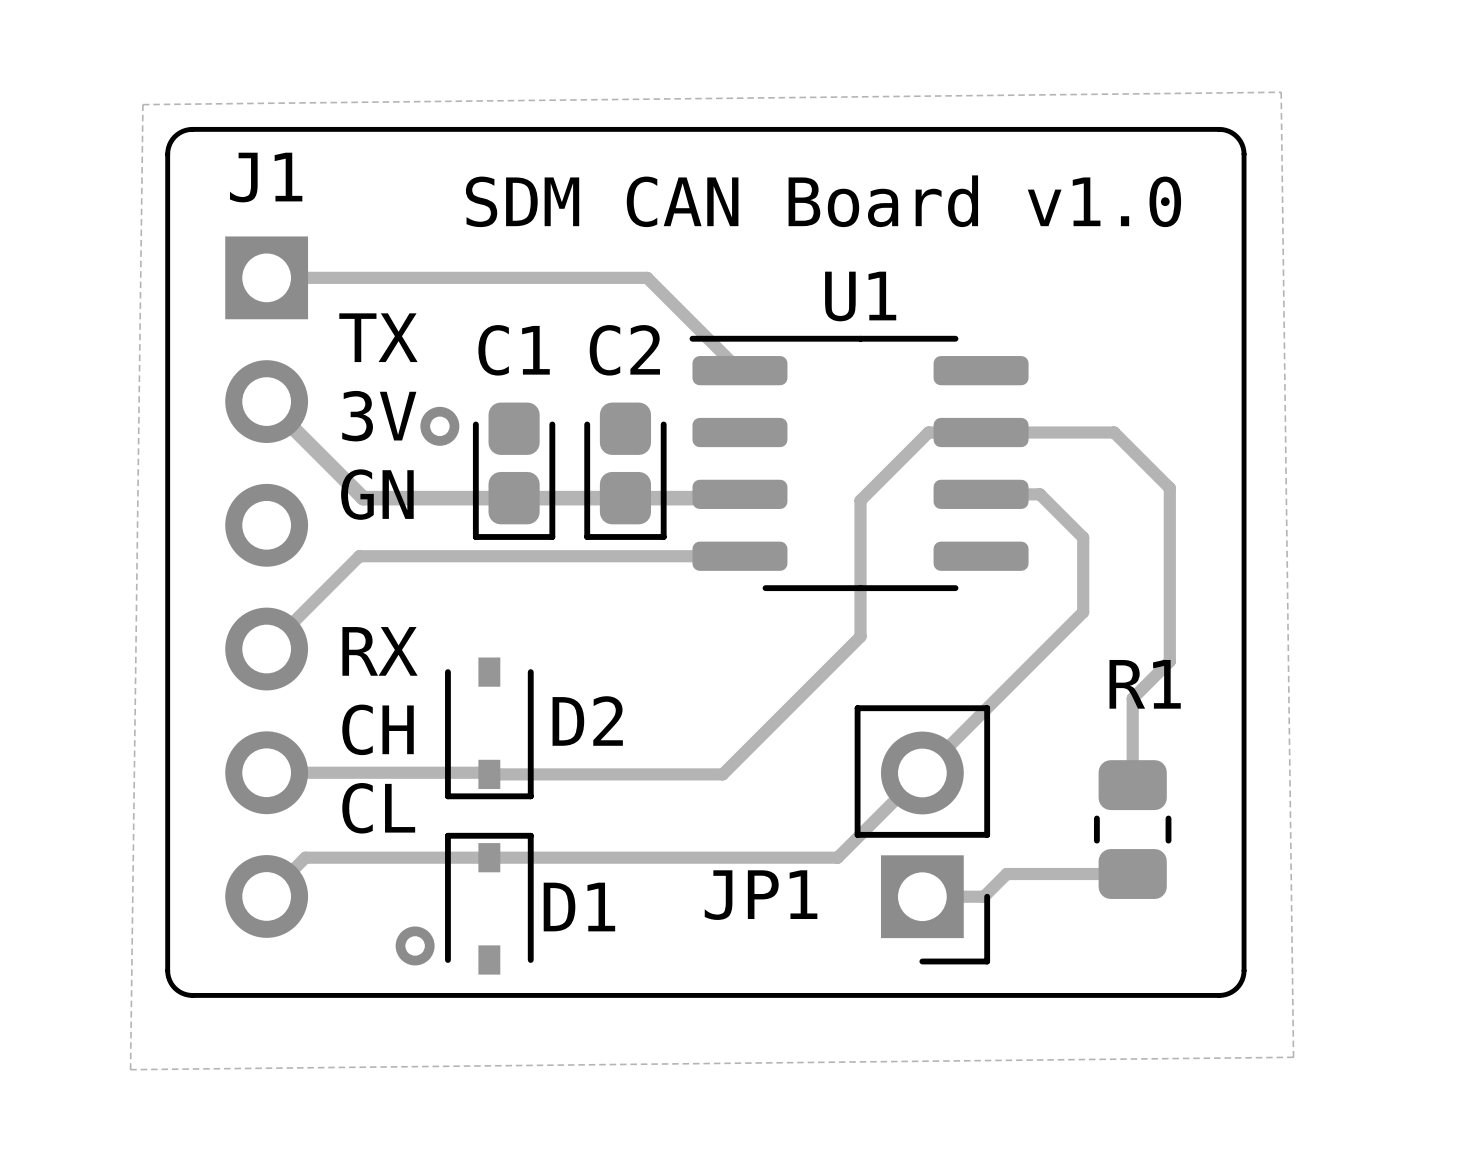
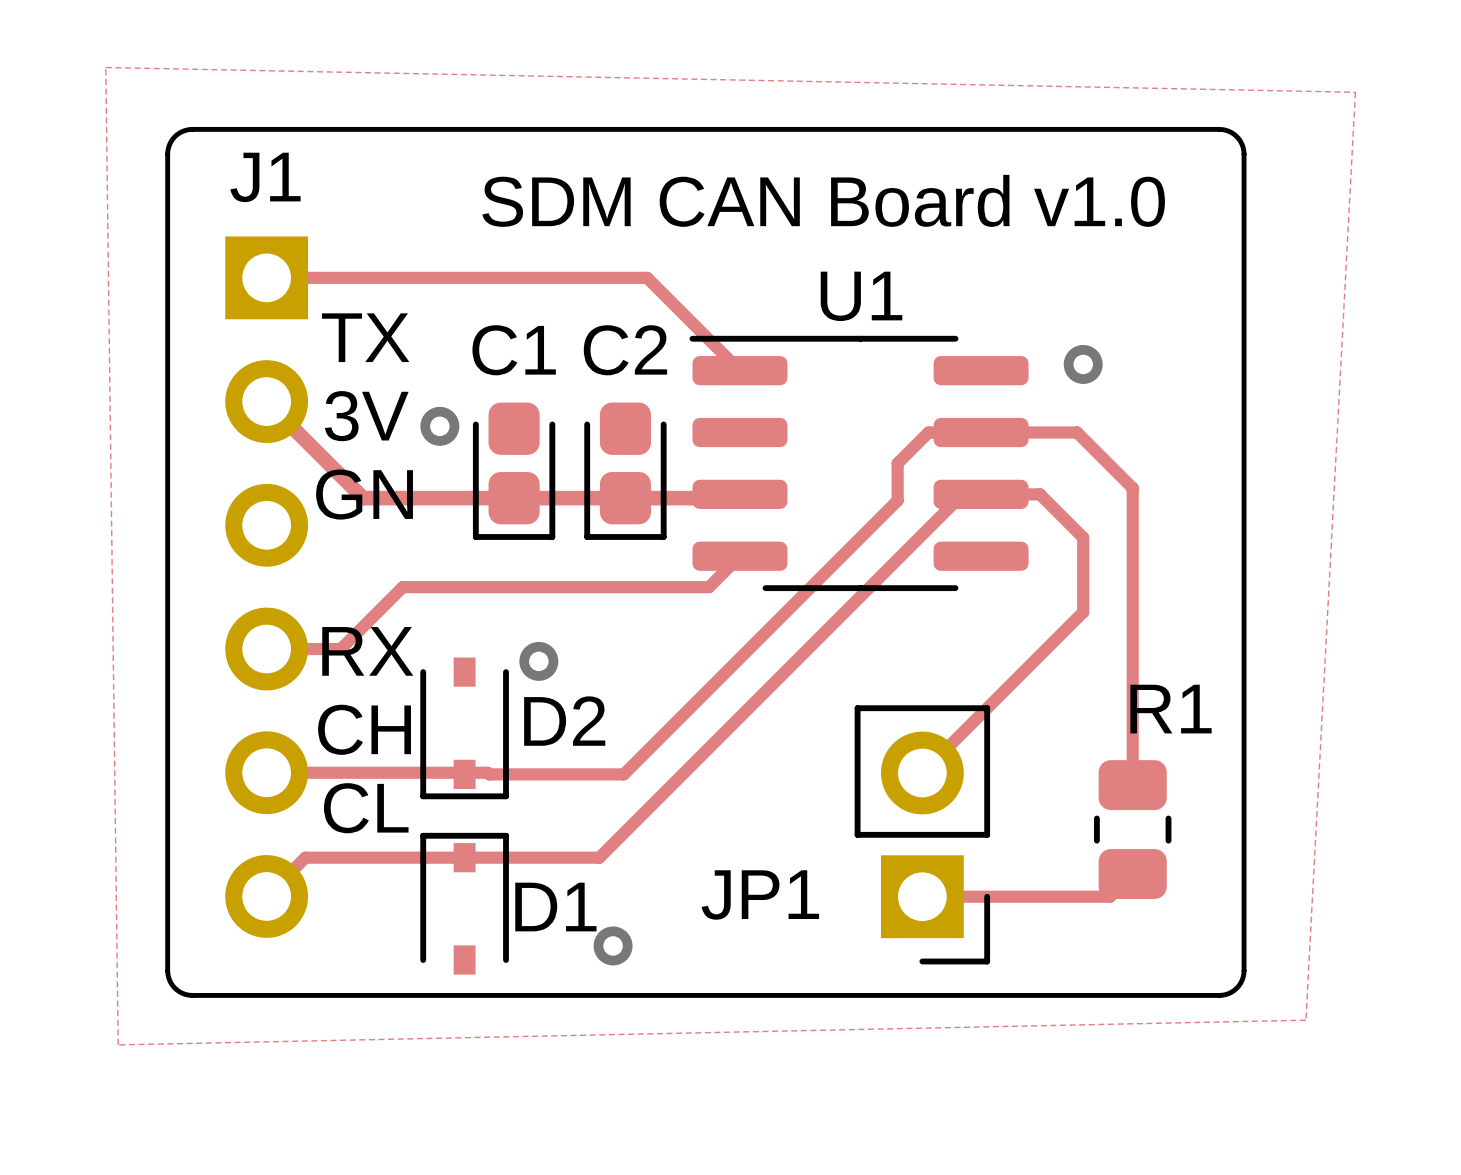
zone outline: (1281, 92) (142, 104) (130, 1069) (1293, 1057) (1281, 92) -> (105, 67) (118, 1044) (1305, 1020) (1355, 92) (105, 67)
text position: TX (378, 337) -> TX (365, 337)
via: none -> (1083, 364)
text position: 3V (379, 416) -> 3V (366, 416)
track: (1077, 432) (1114, 432) (1169, 488) (1169, 661) (1132, 698) -> (1077, 432) (1132, 488) (1132, 698)
track: (897, 463) (860, 500) (860, 636) (722, 774) (623, 774) -> (897, 463) (897, 500) (623, 774)
text position: GN (377, 494) -> GN (364, 494)
track: (739, 556) (359, 556) (266, 649) -> (739, 556) (709, 587) (402, 587) (340, 649) (266, 649)
text position: RX (380, 651) -> RX (367, 651)
via: none -> (538, 661)
R1 name position: R1 (1145, 684) -> R1 (1170, 709)
D2 position: (489, 728) -> (464, 728)
text position: CH (378, 729) -> CH (364, 729)
track: (922, 772) (837, 857) (599, 857) -> (981, 494) (962, 494) (599, 857)
text position: CL (378, 808) -> CL (366, 808)
track: (1132, 874) (1006, 874) (983, 896) -> (1132, 874) (1110, 896) (983, 896)
D1 position: (489, 903) -> (464, 903)
via: (415, 945) -> none
via: none -> (613, 945)

